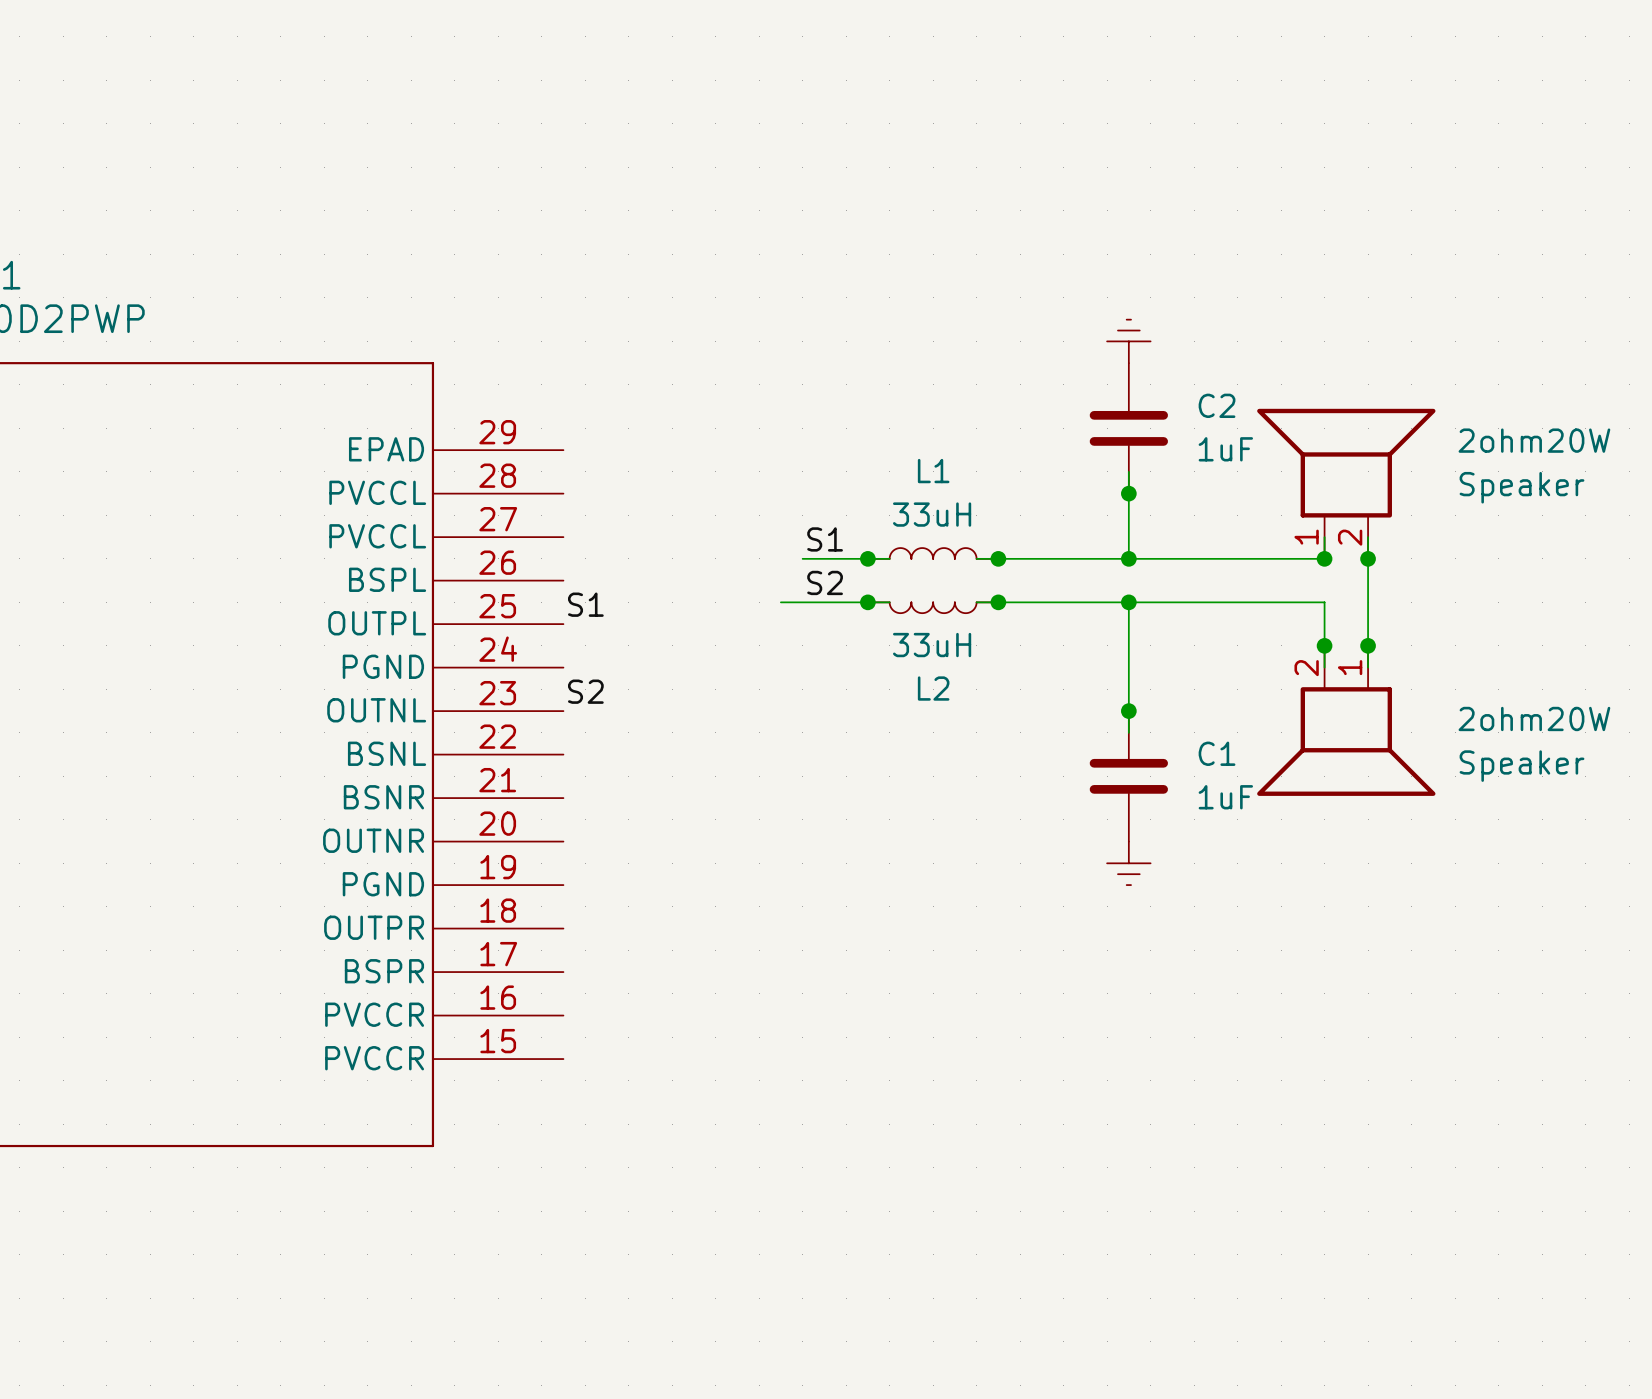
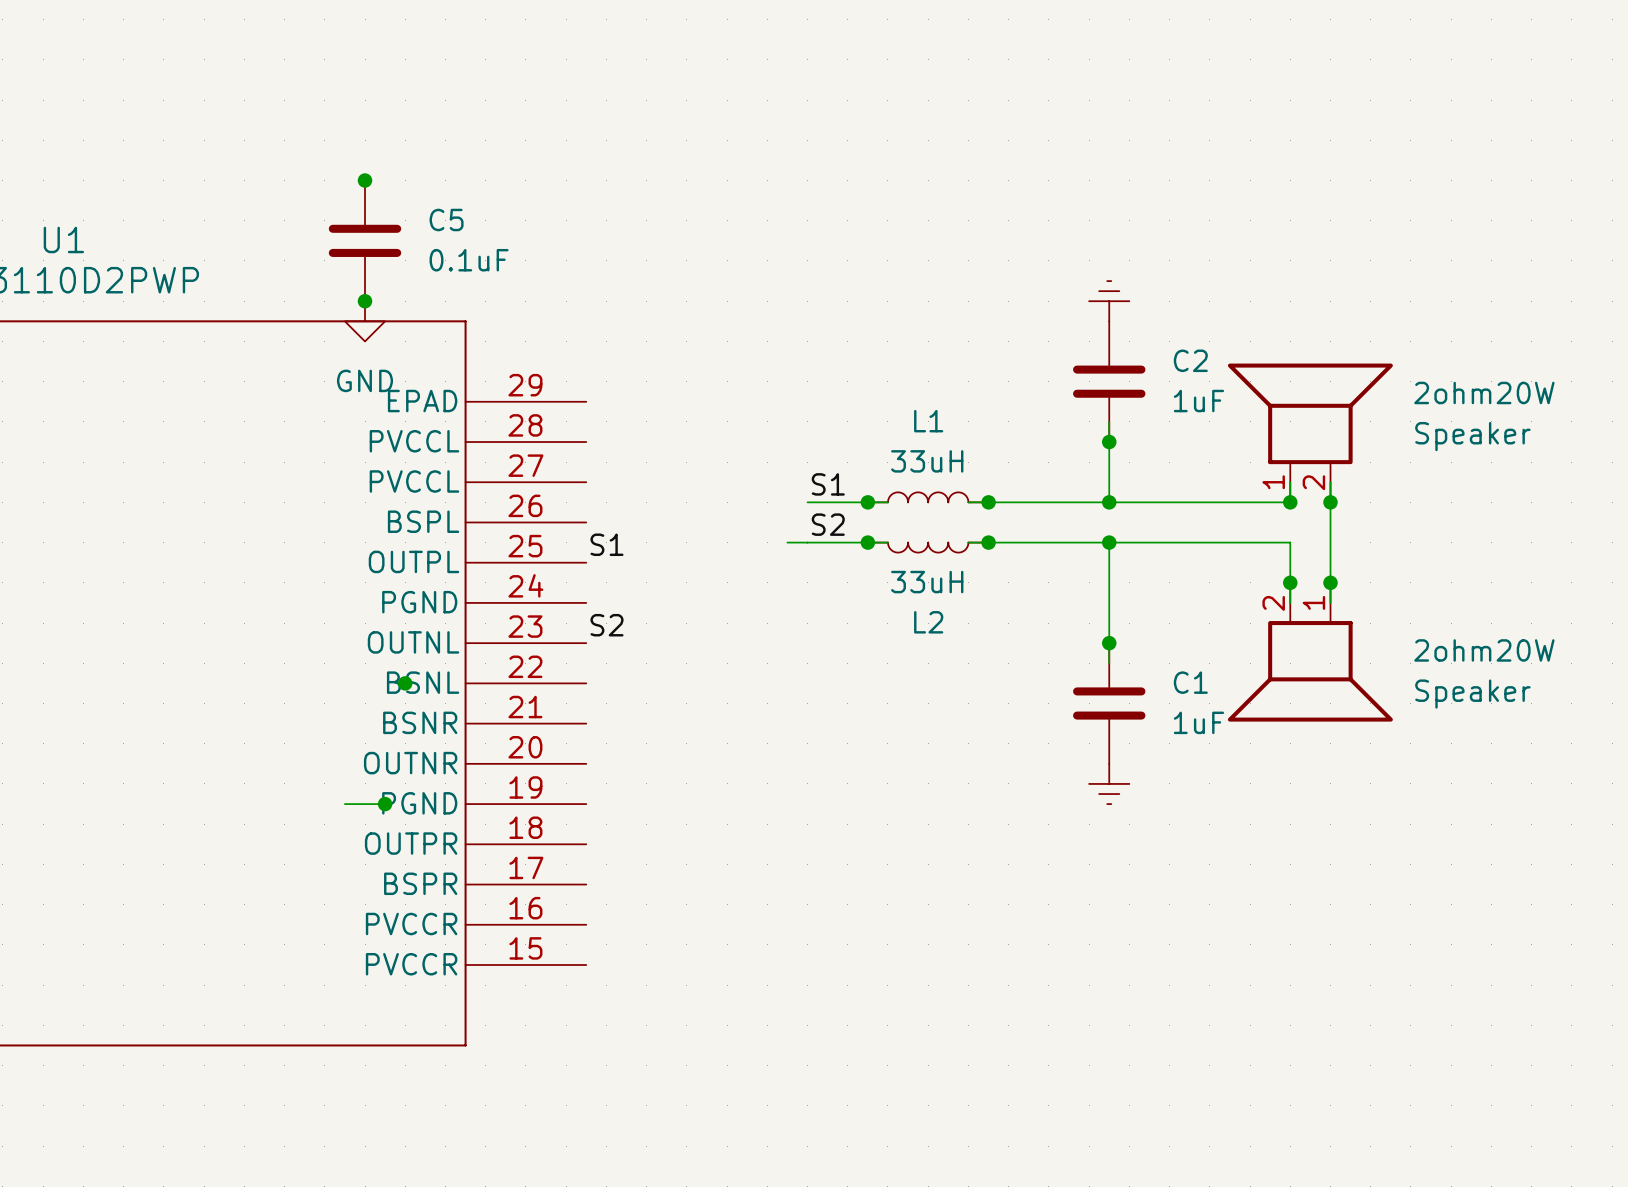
junction: none -> (365, 180)
C5: none -> 0.1uF (365, 240)
junction: none -> (365, 301)
power symbol: none -> GND (365, 321)
junction: none -> (405, 683)
wire: none -> (344, 804) (385, 804)
junction: none -> (385, 804)

